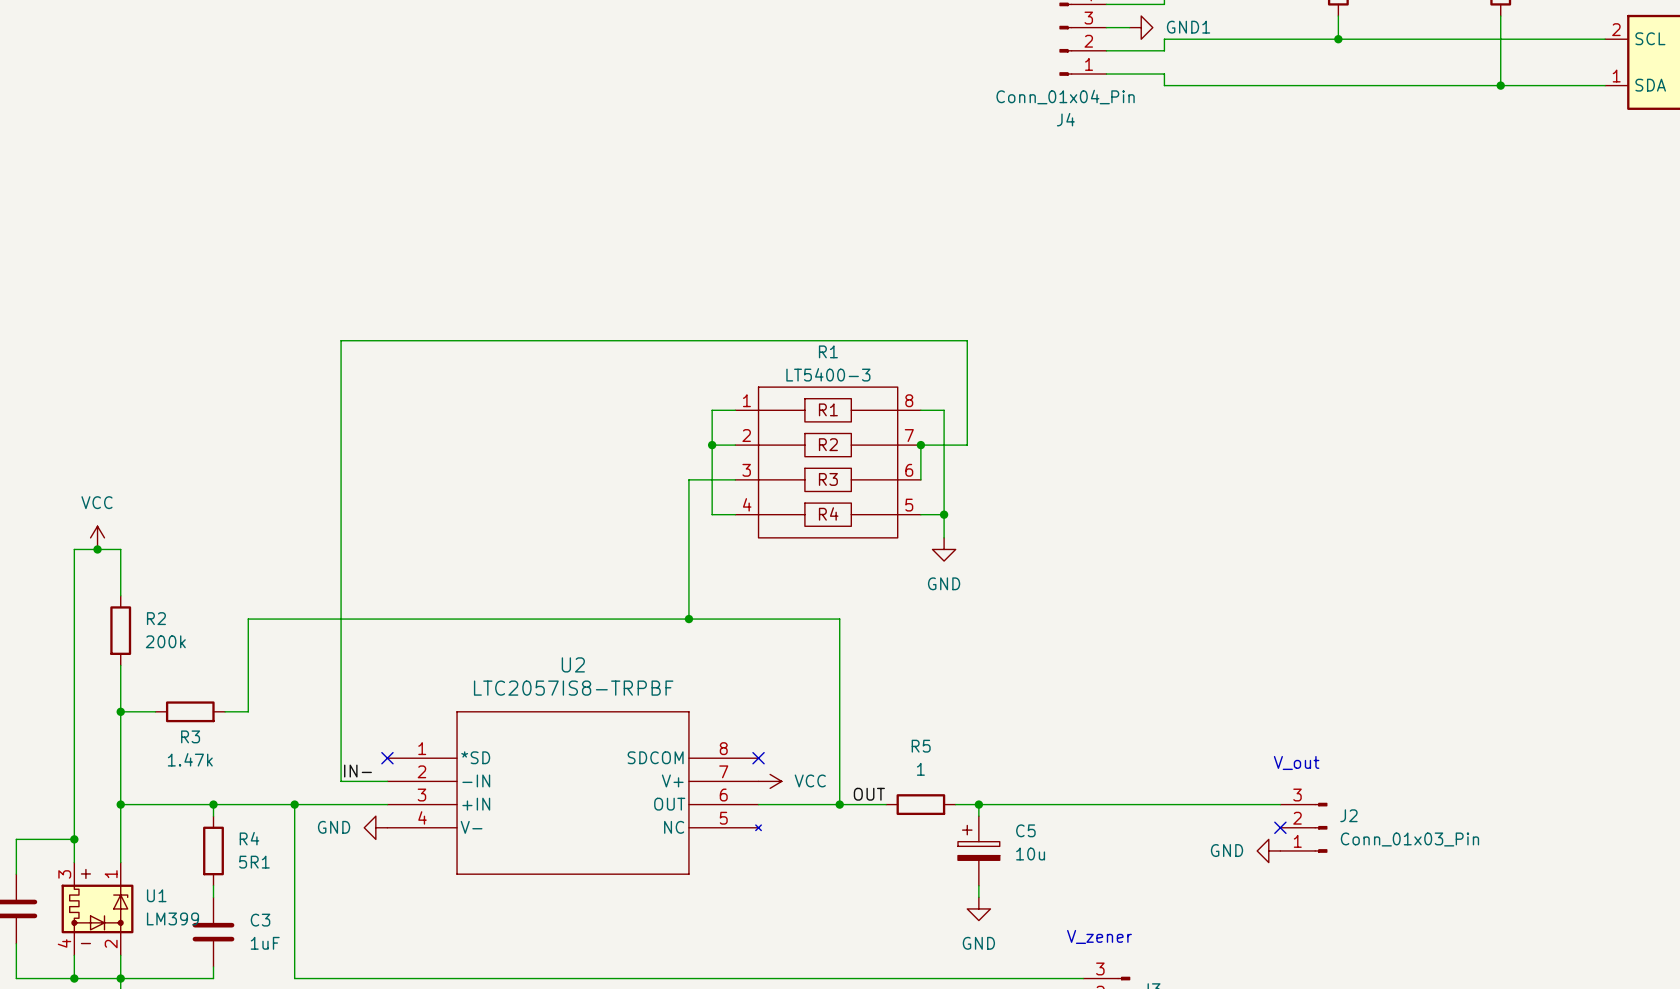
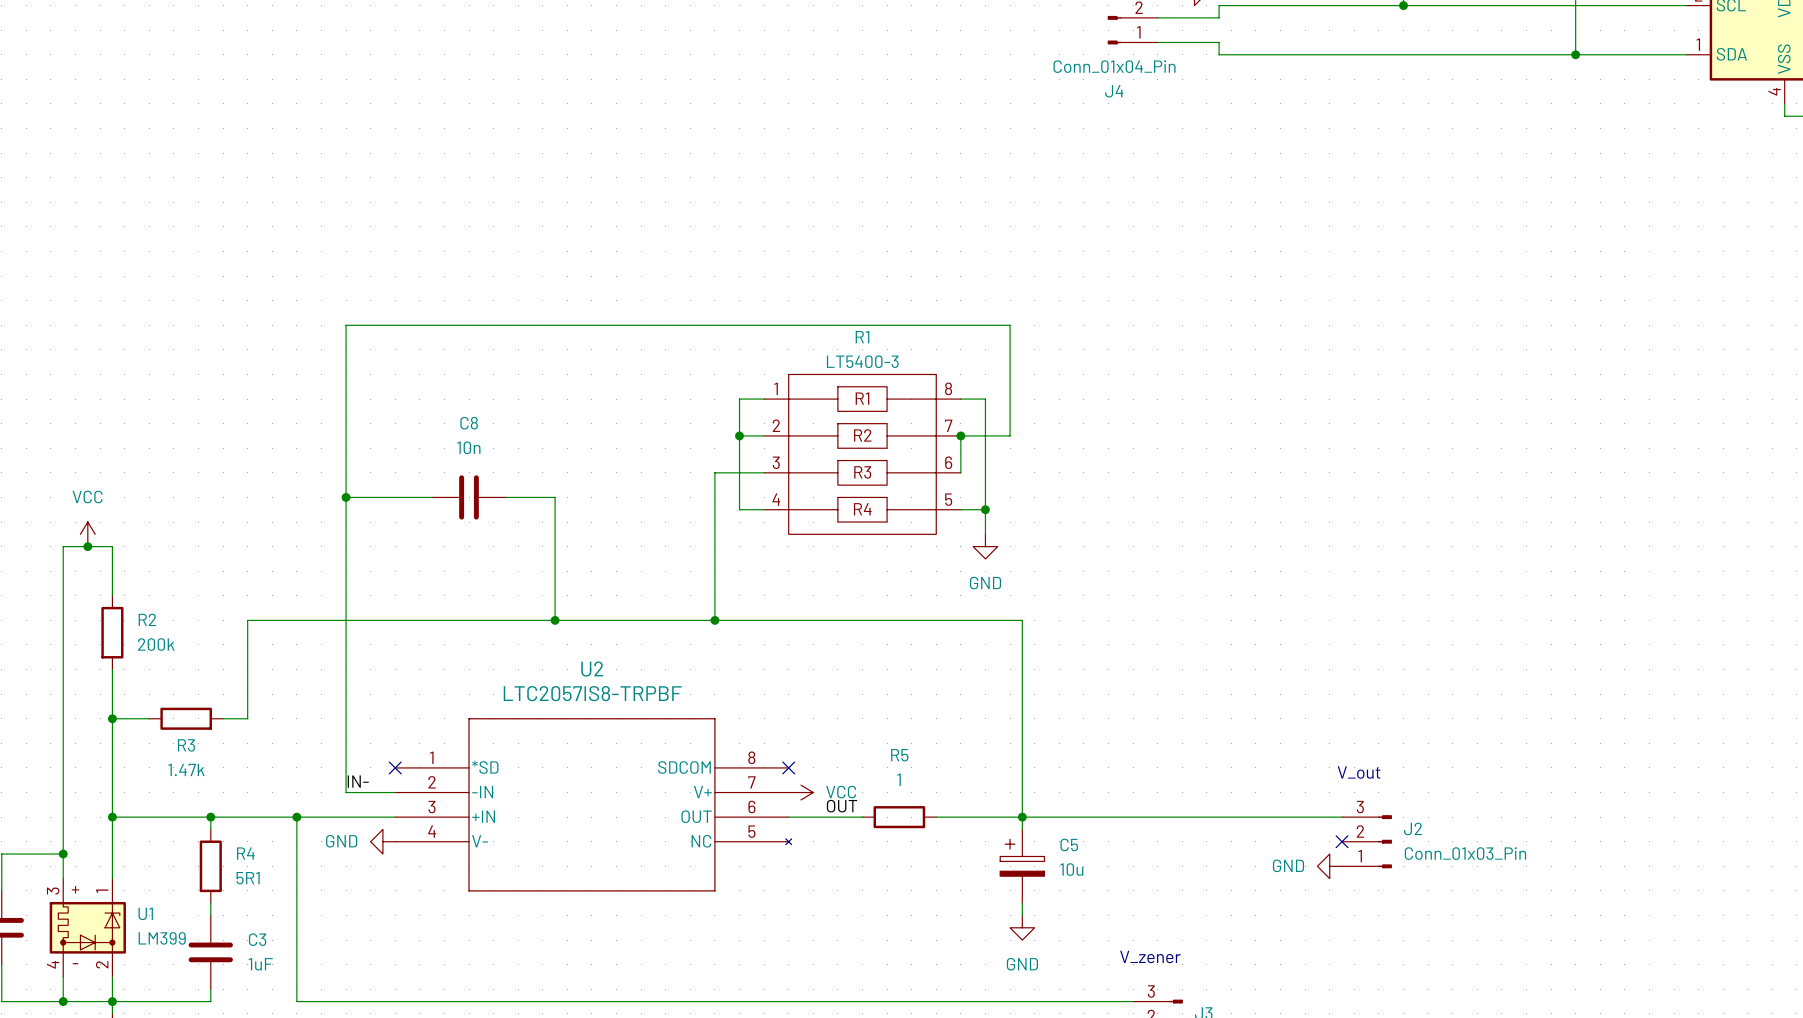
wire: none -> (346, 497) (432, 497)
junction: none -> (346, 497)
C8: none -> 10n (469, 497)
wire: none -> (505, 497) (555, 497) (555, 620)
junction: none -> (555, 620)
wire: (839, 619) (839, 804) -> (874, 620) (1022, 620) (1022, 817)
label position: OUT (869, 794) -> OUT (842, 806)
wire: (828, 804) (886, 804) -> (936, 817) (997, 817)
junction: (839, 804) -> none
R5 position: (920, 804) -> (899, 817)

